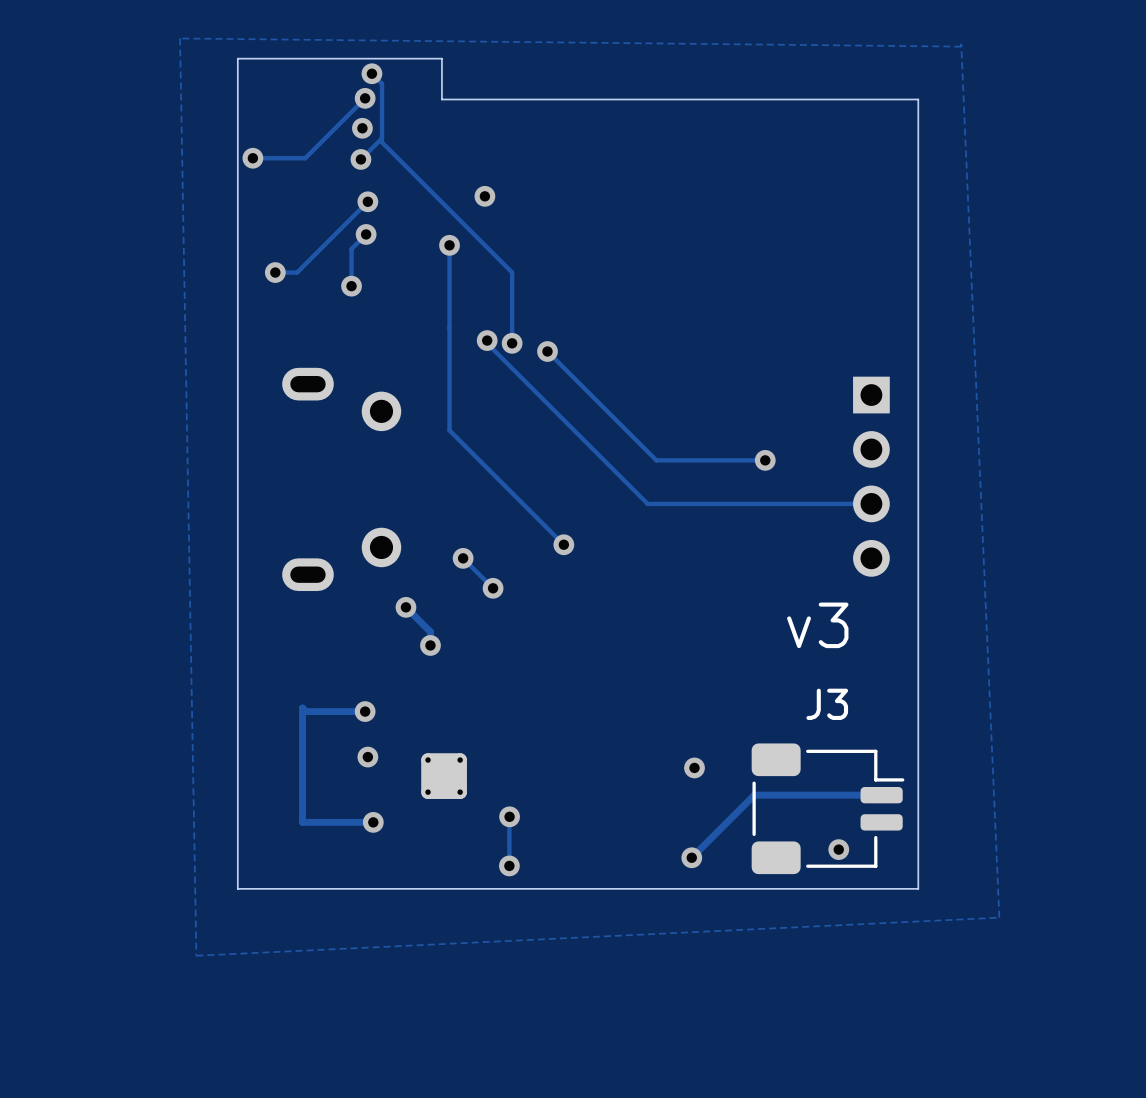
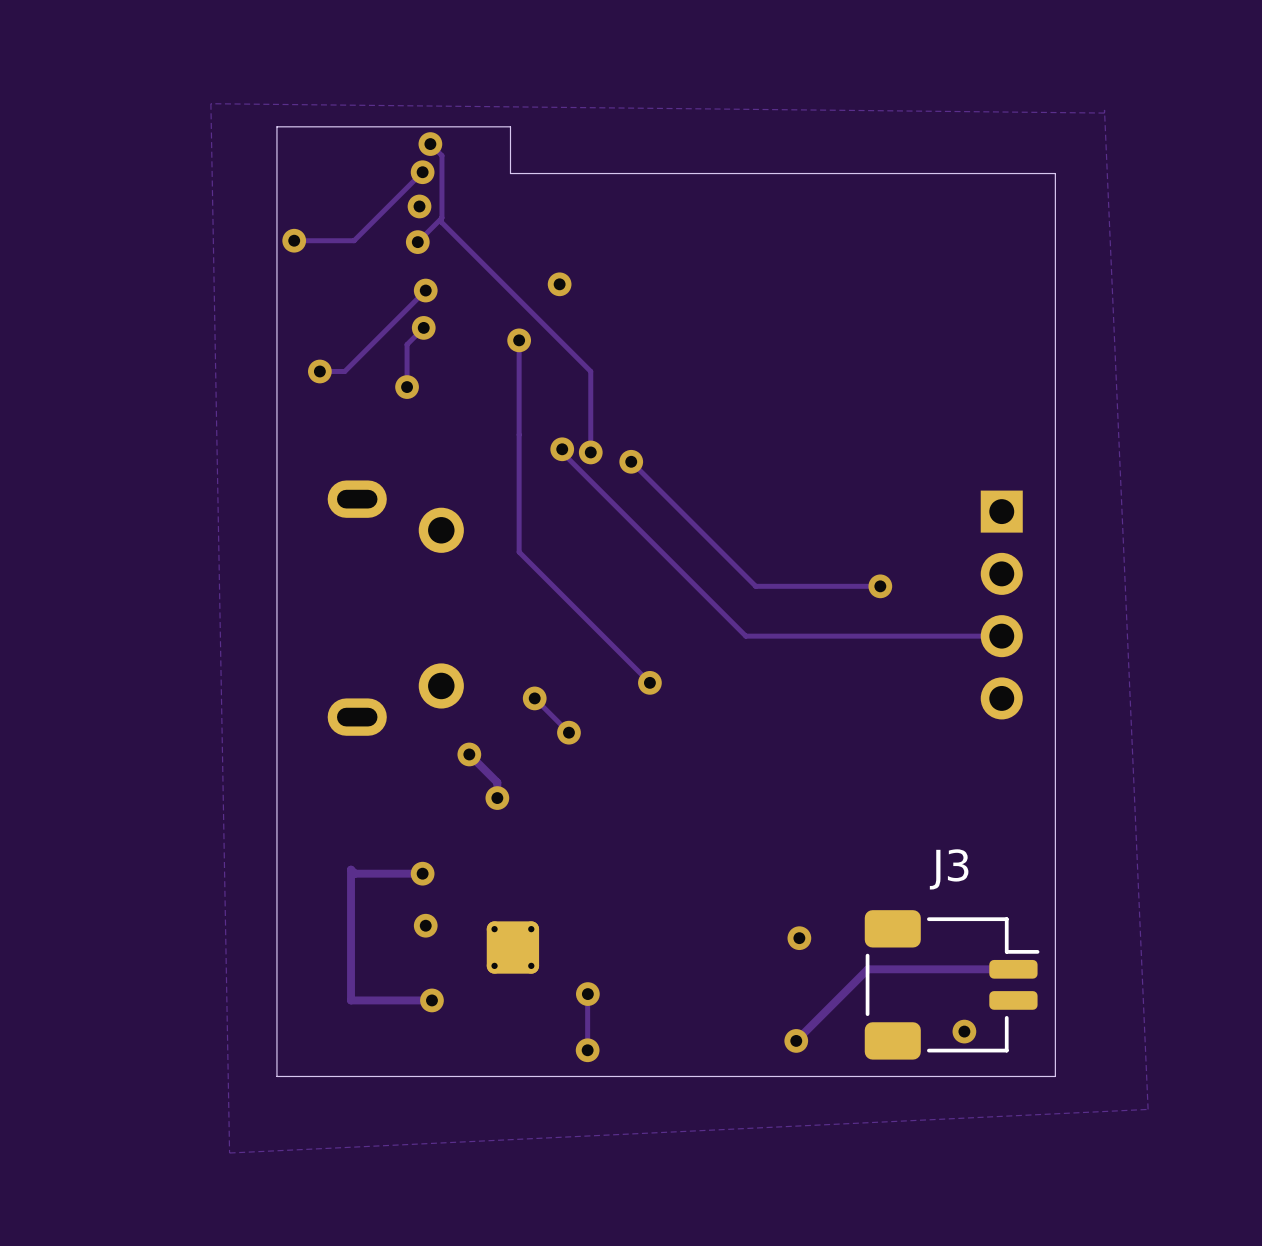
text: v3 (817, 625) -> none

